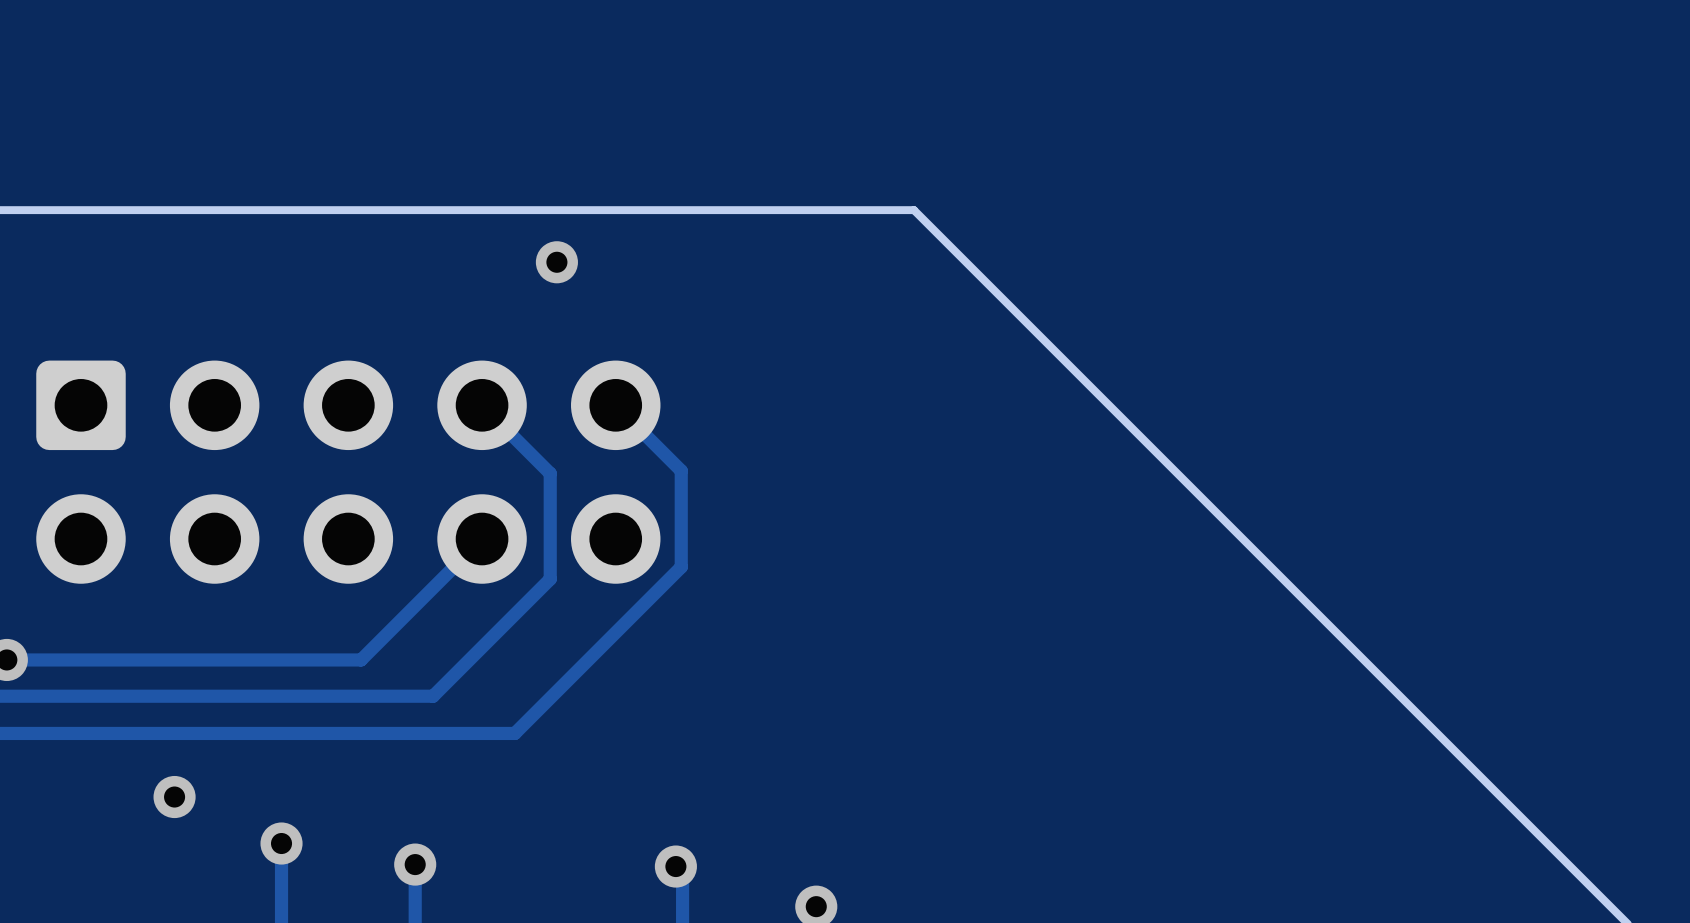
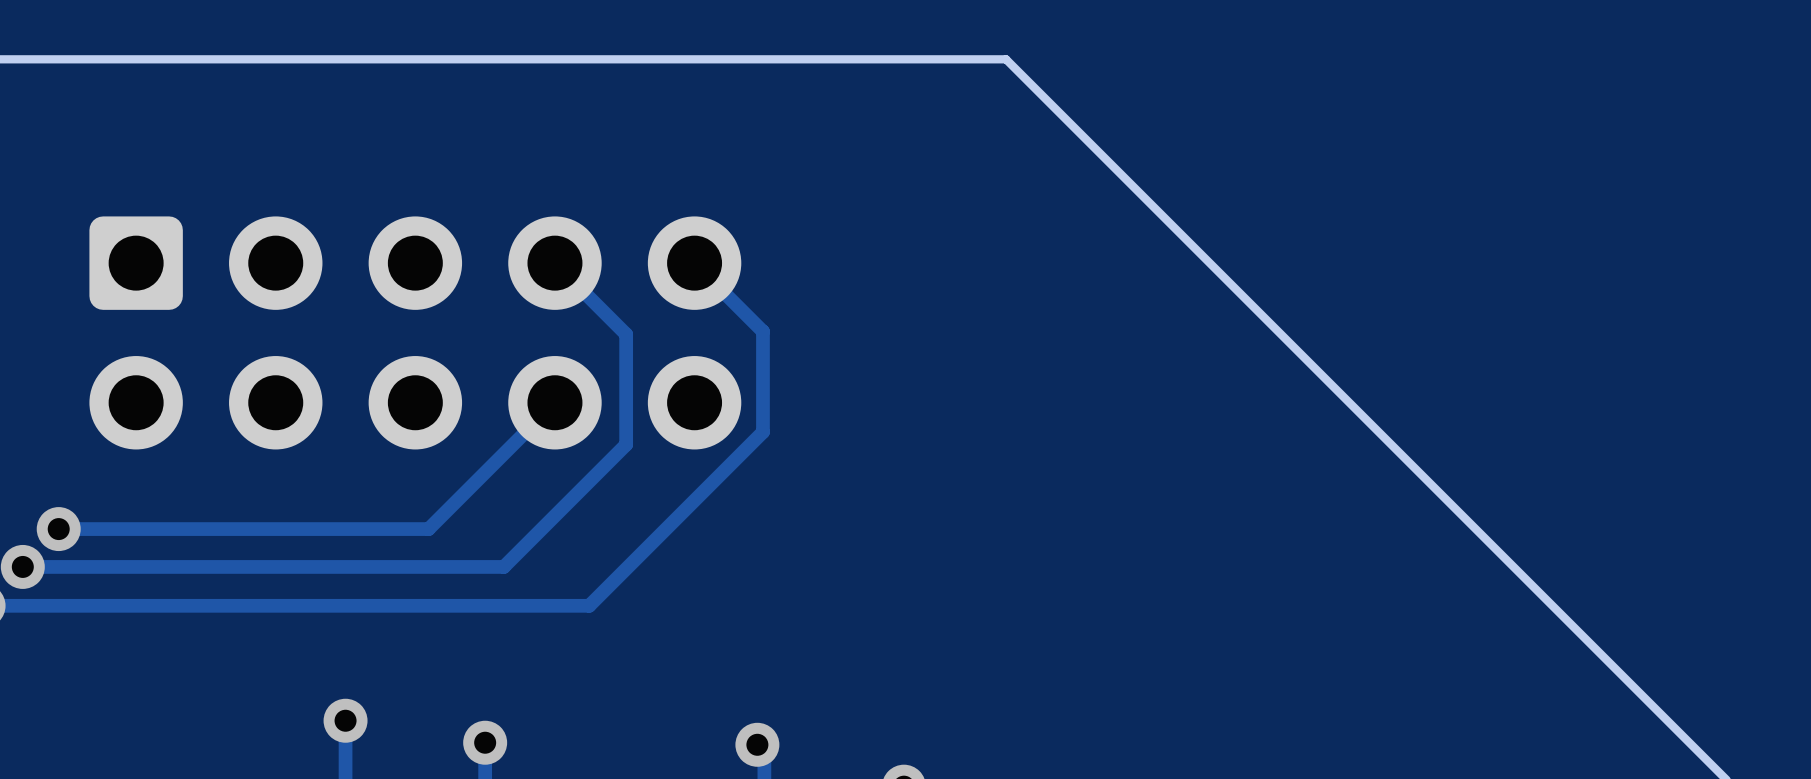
via: (556, 262) -> none
via: (174, 797) -> none

